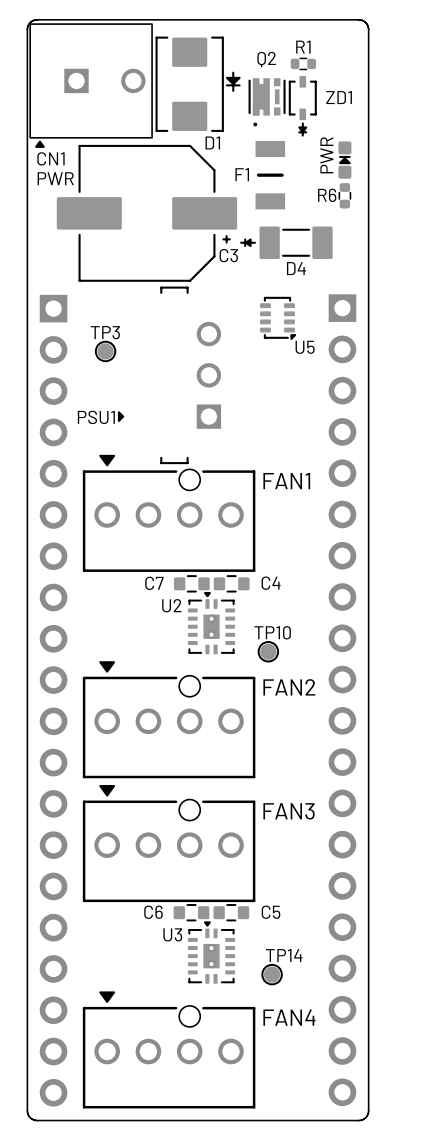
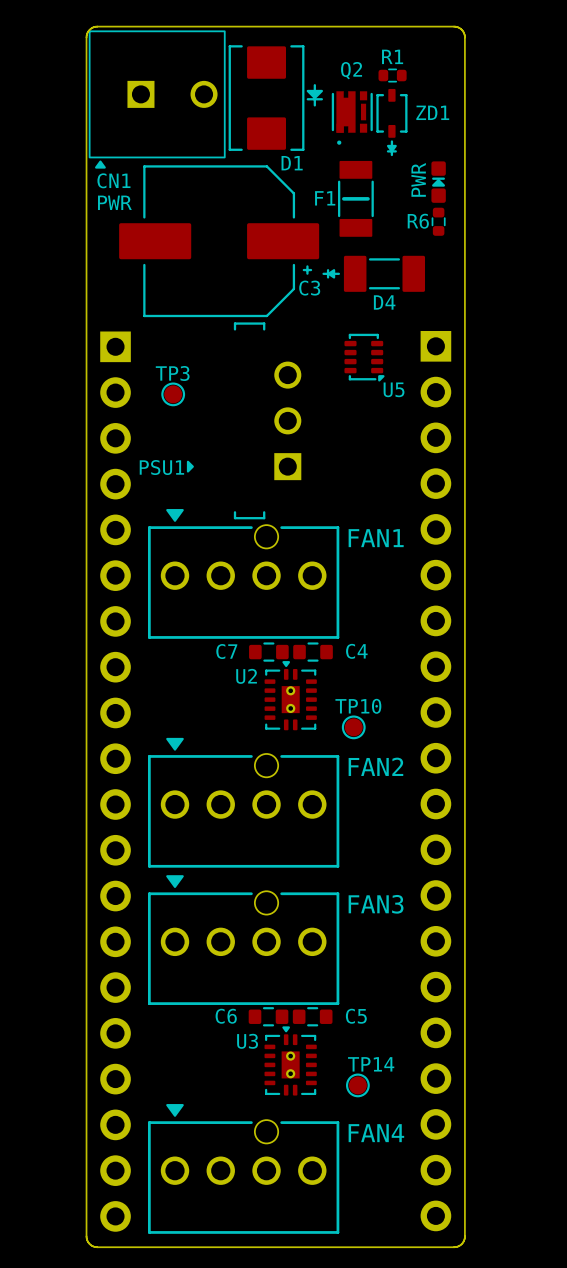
F1 footprint: [255, 140, 286, 210] -> [338, 160, 374, 237]

